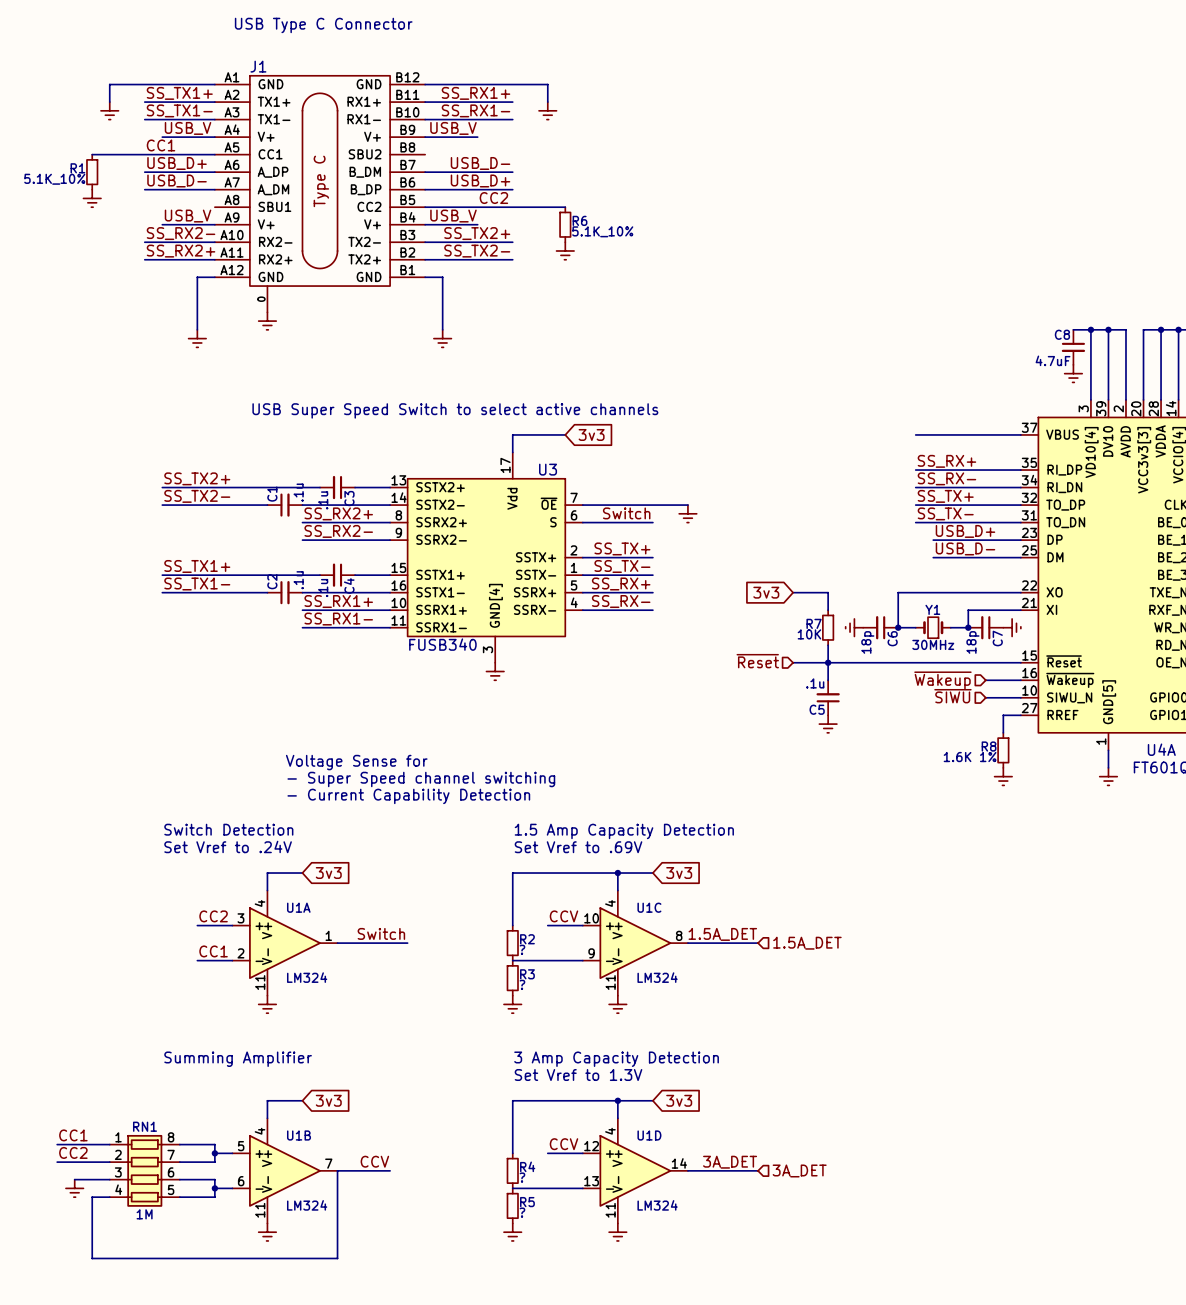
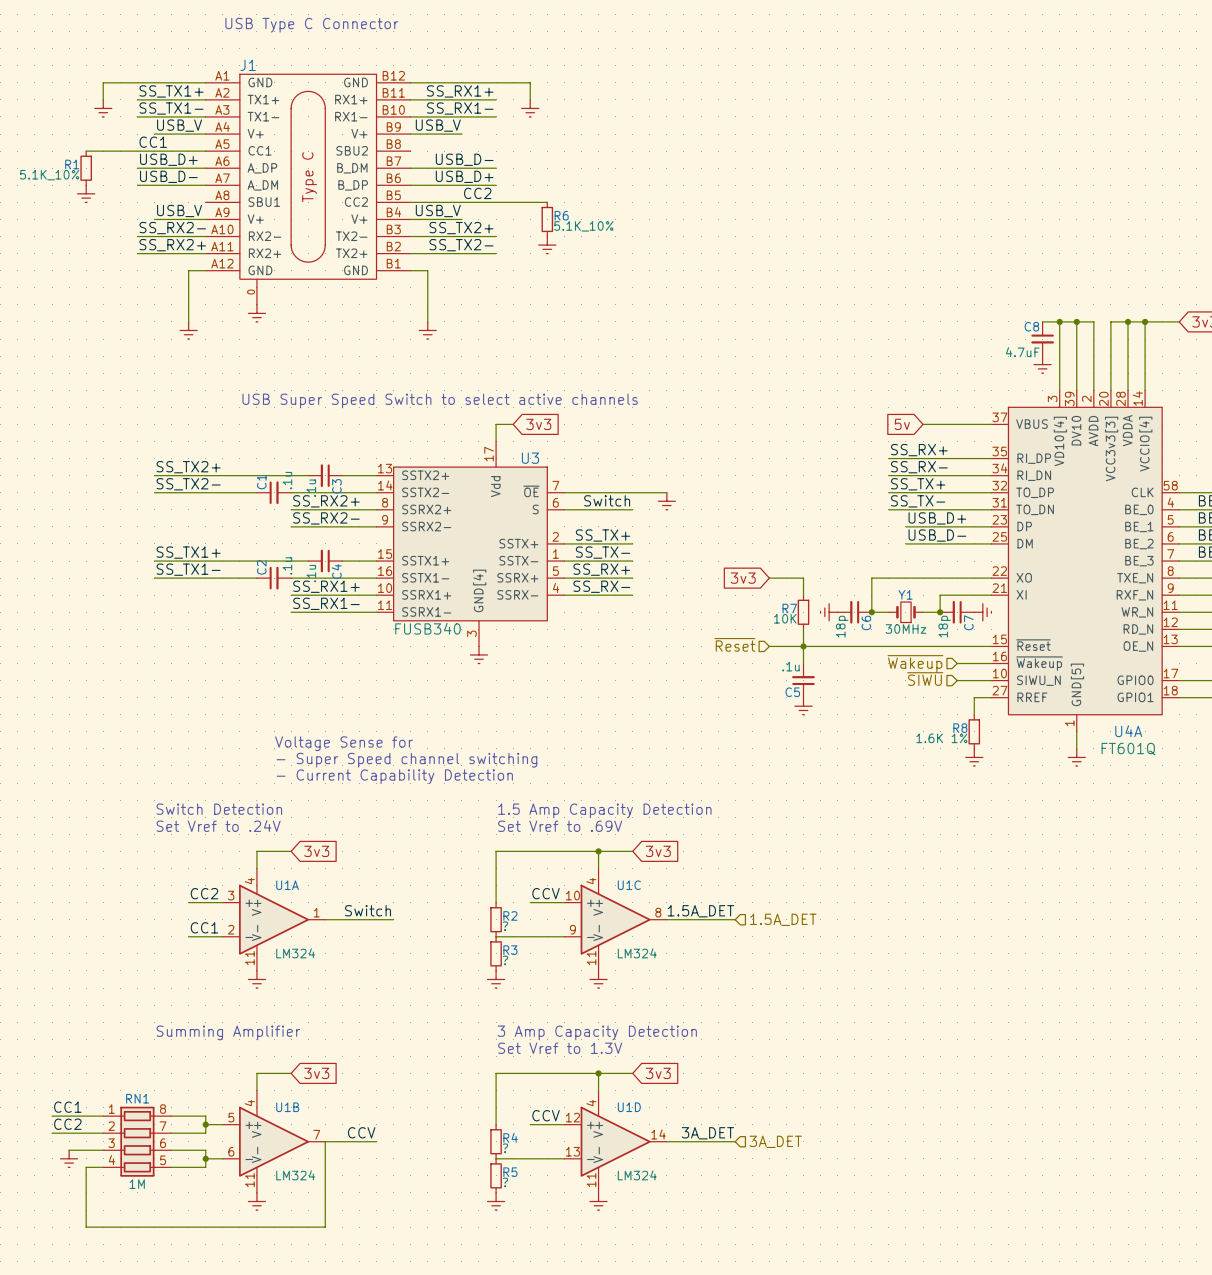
wire: (530, 434) (565, 434) -> none
global label position: 3v3 (591, 434) -> 3v3 (538, 424)
wire: (915, 434) (950, 434) -> none
global label: none -> 5v (902, 424)

